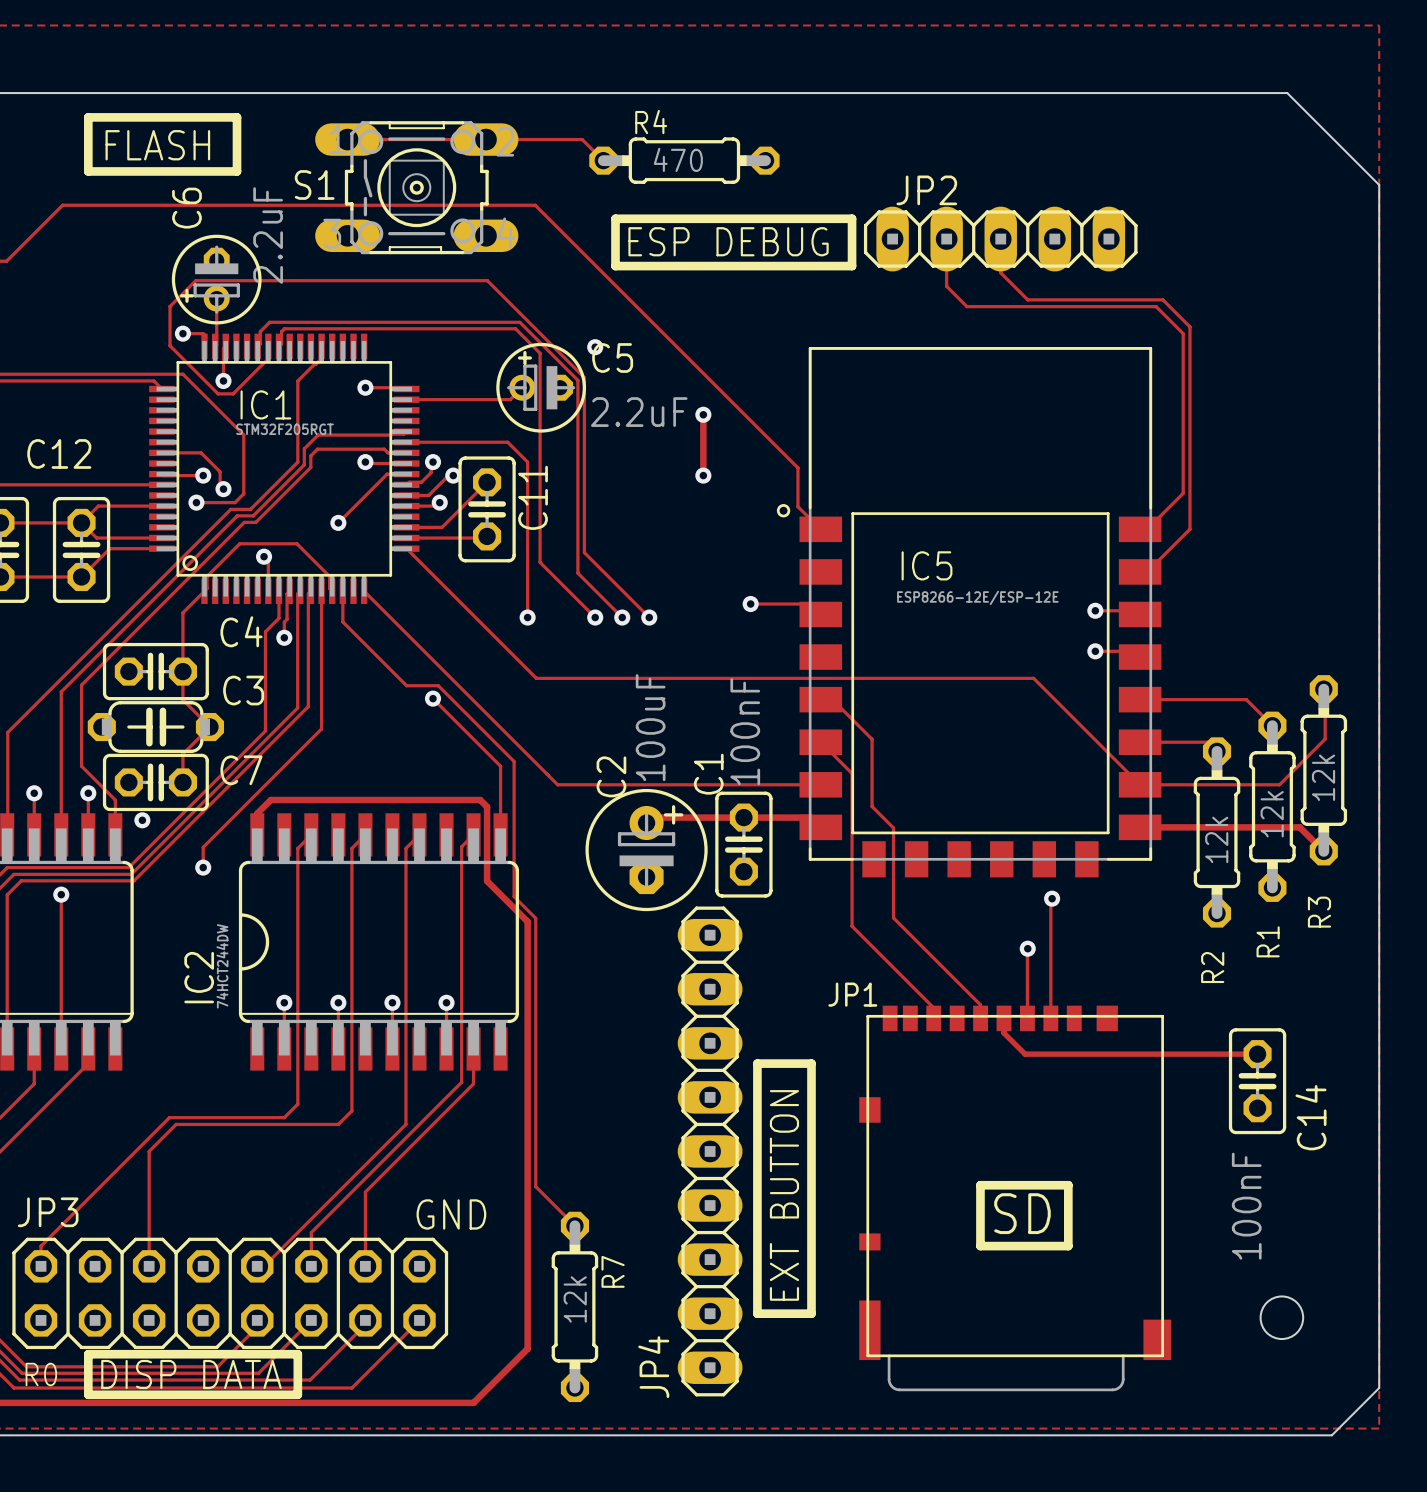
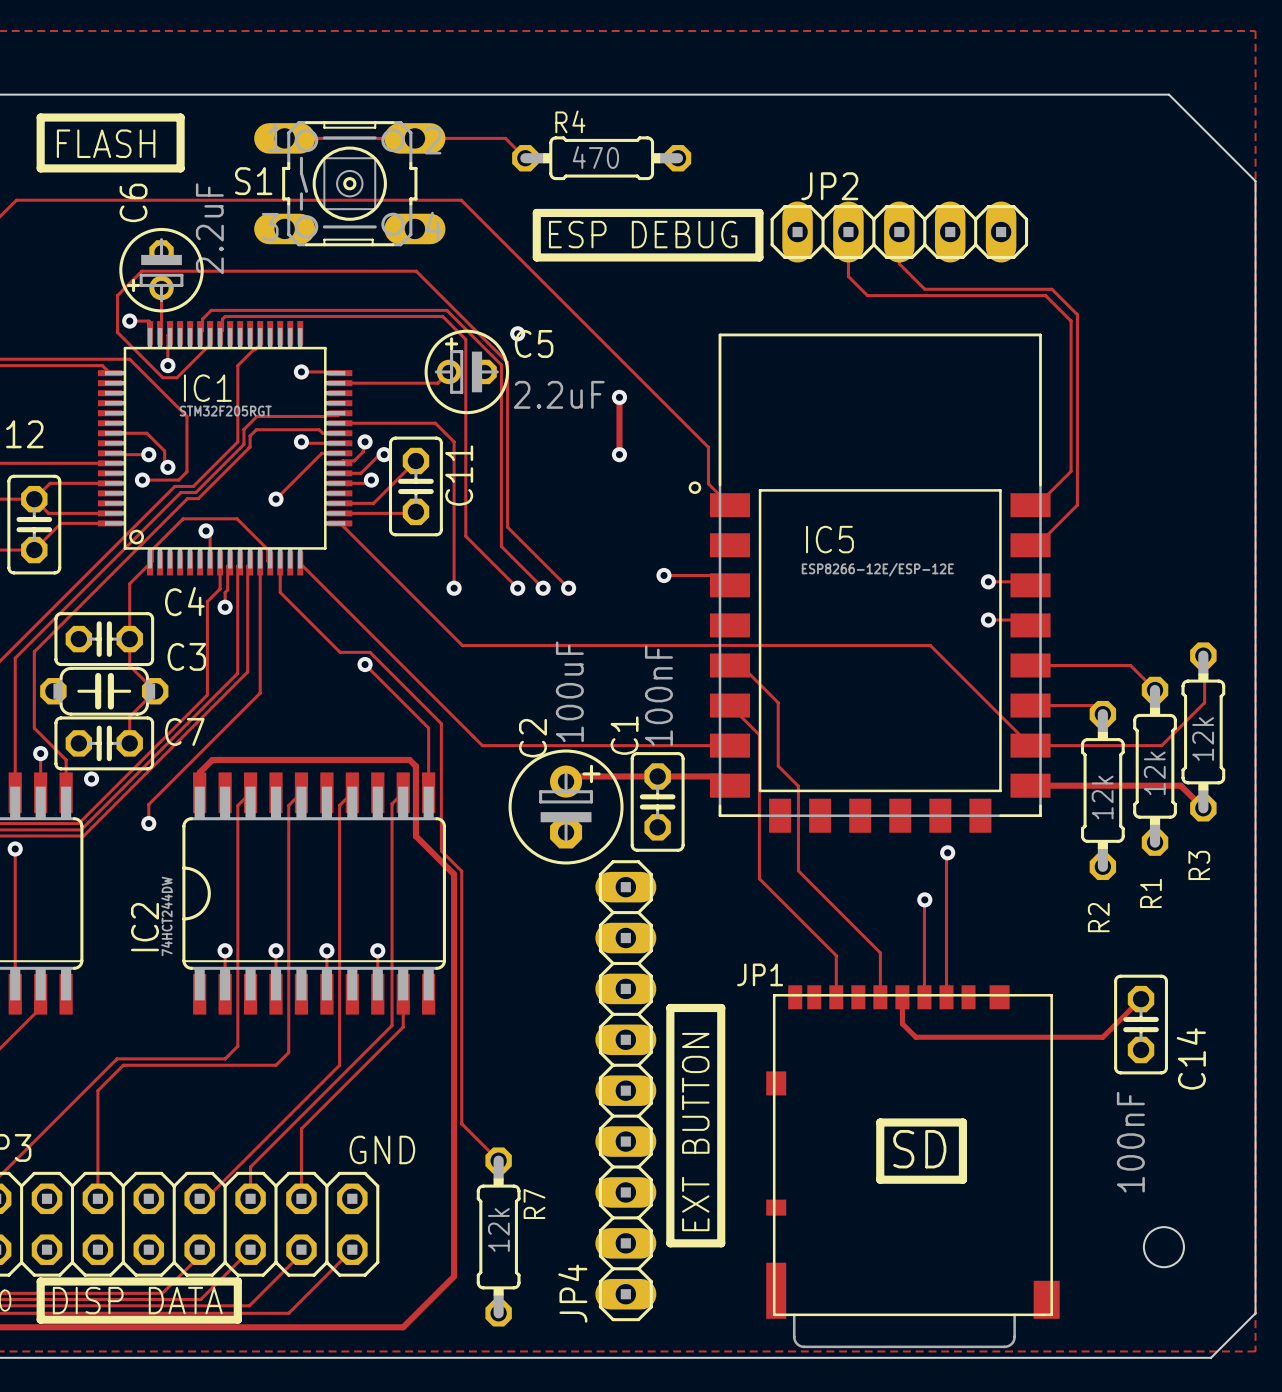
track: none -> (836, 965) (836, 997)
track: none -> (880, 965) (880, 997)
track: (1004, 1018) (1004, 1033) (1025, 1054) (1257, 1054) -> (902, 997) (902, 1023) (915, 1037) (1102, 1037) (1141, 999)
track: none -> (924, 965) (924, 997)
track: none -> (946, 965) (946, 997)
JP1 position: (1015, 1198) -> (912, 1166)

